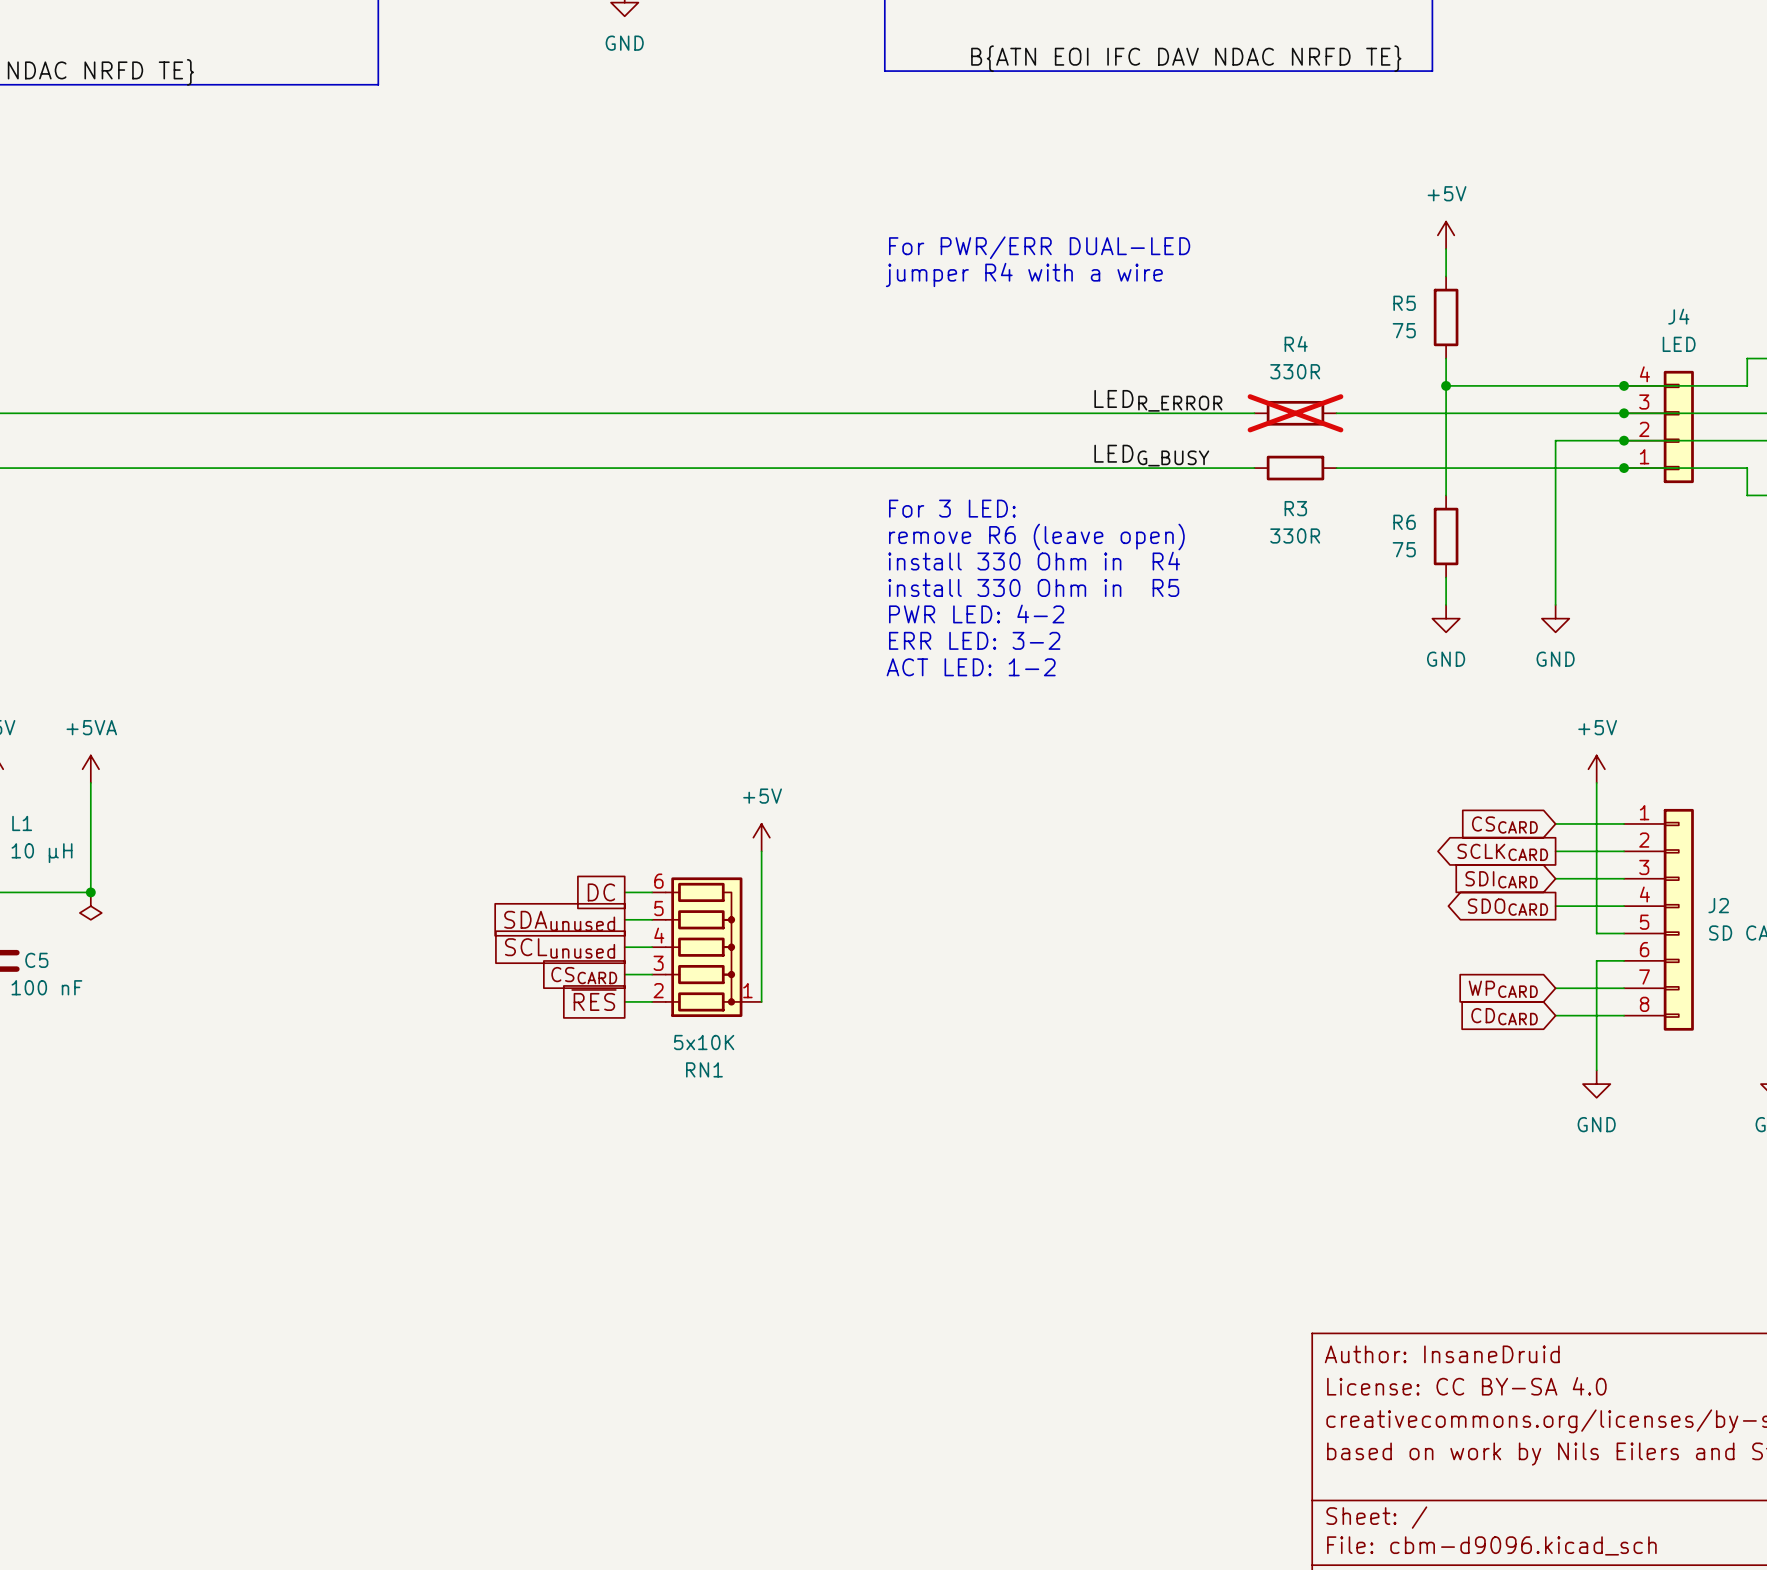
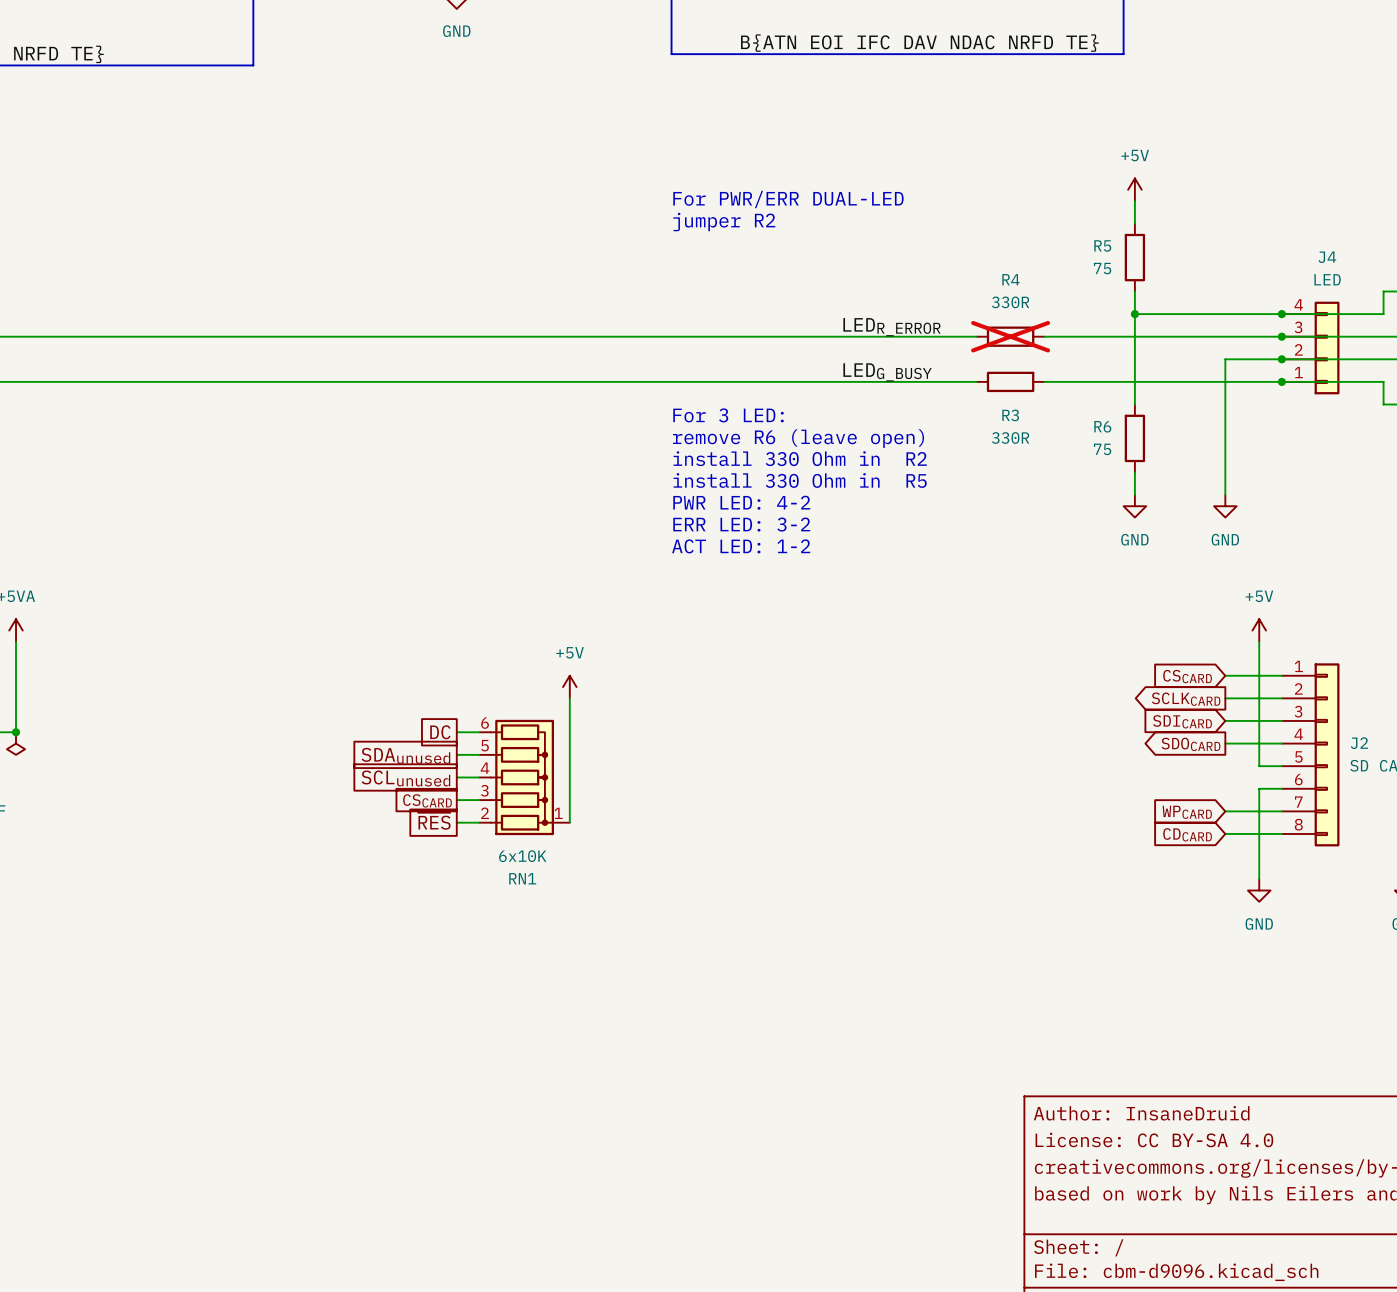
text: jumper R4 with a wire (1024, 274) -> jumper R2 (724, 222)
text: install 330 Ohm in R4 (1034, 561) -> install 330 Ohm in R2 (800, 458)
RN1 value: 5x10K (704, 1042) -> 6x10K (522, 856)

